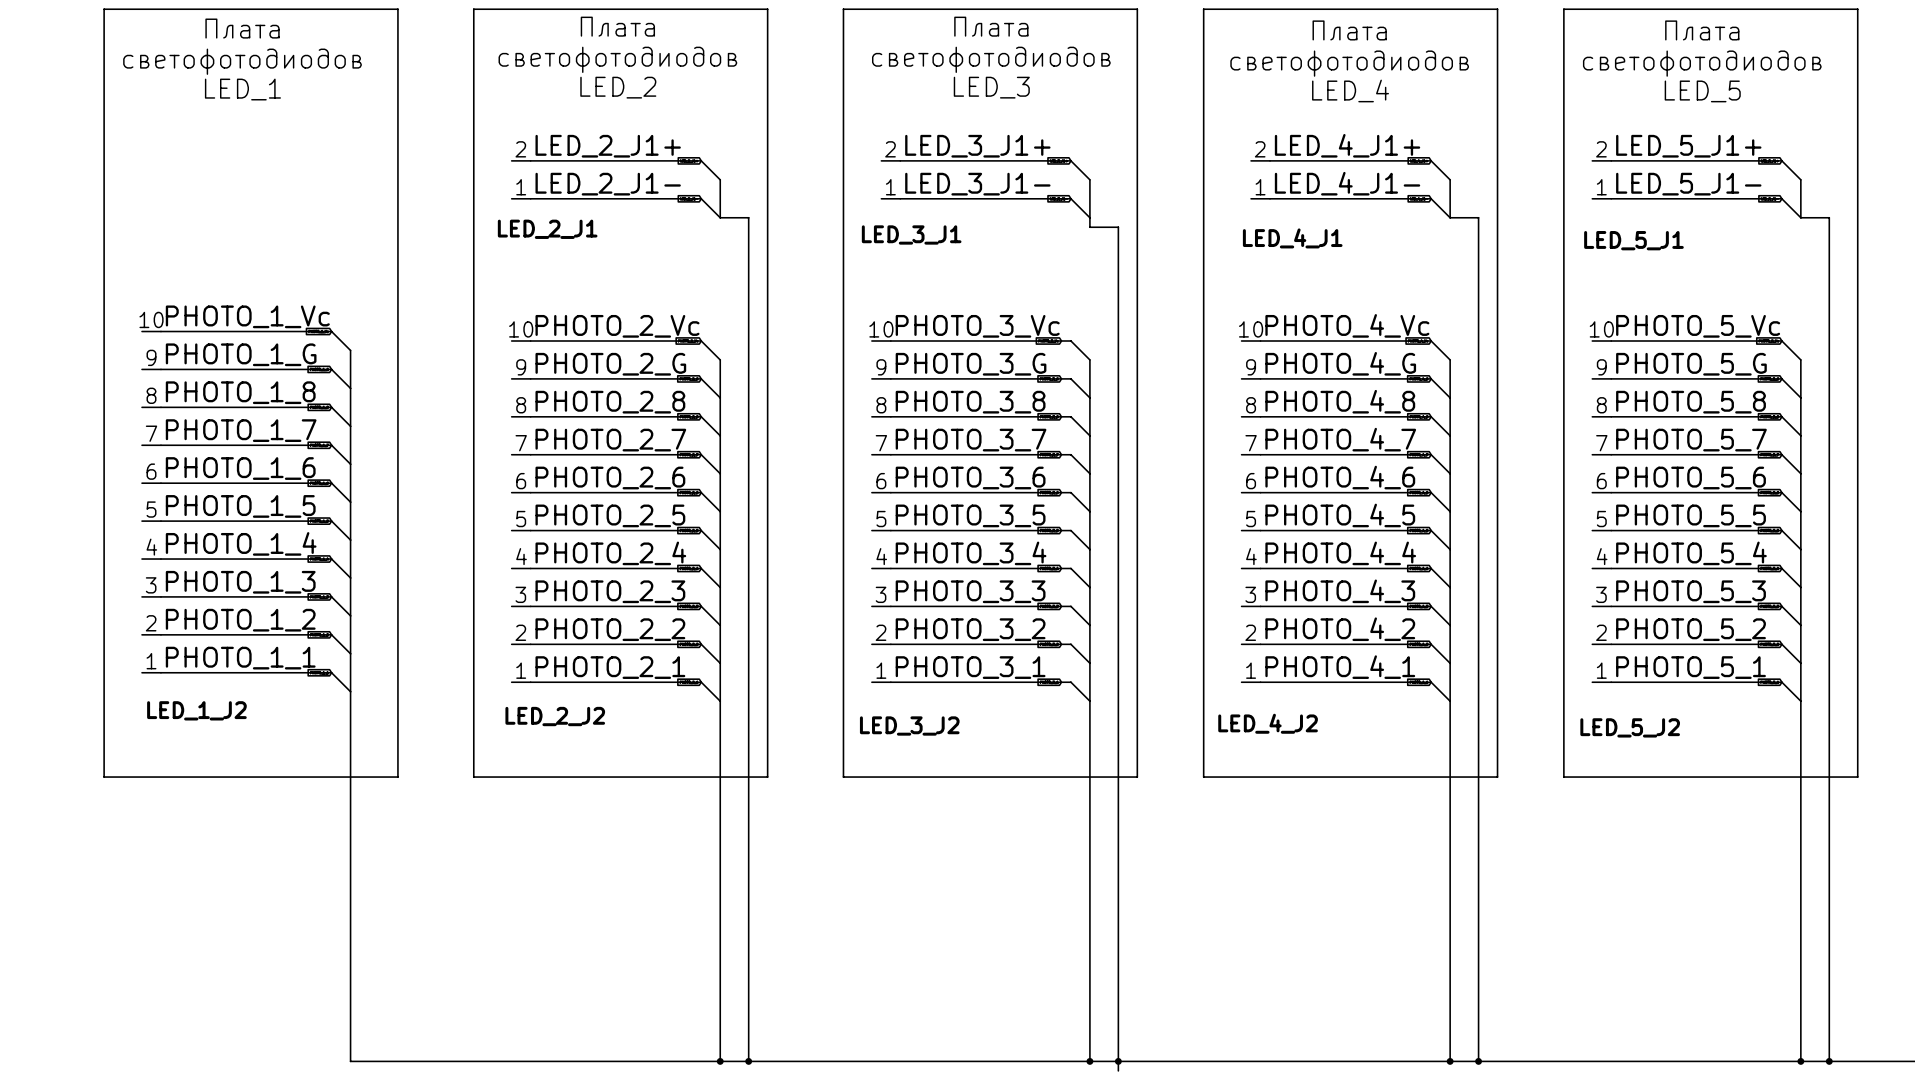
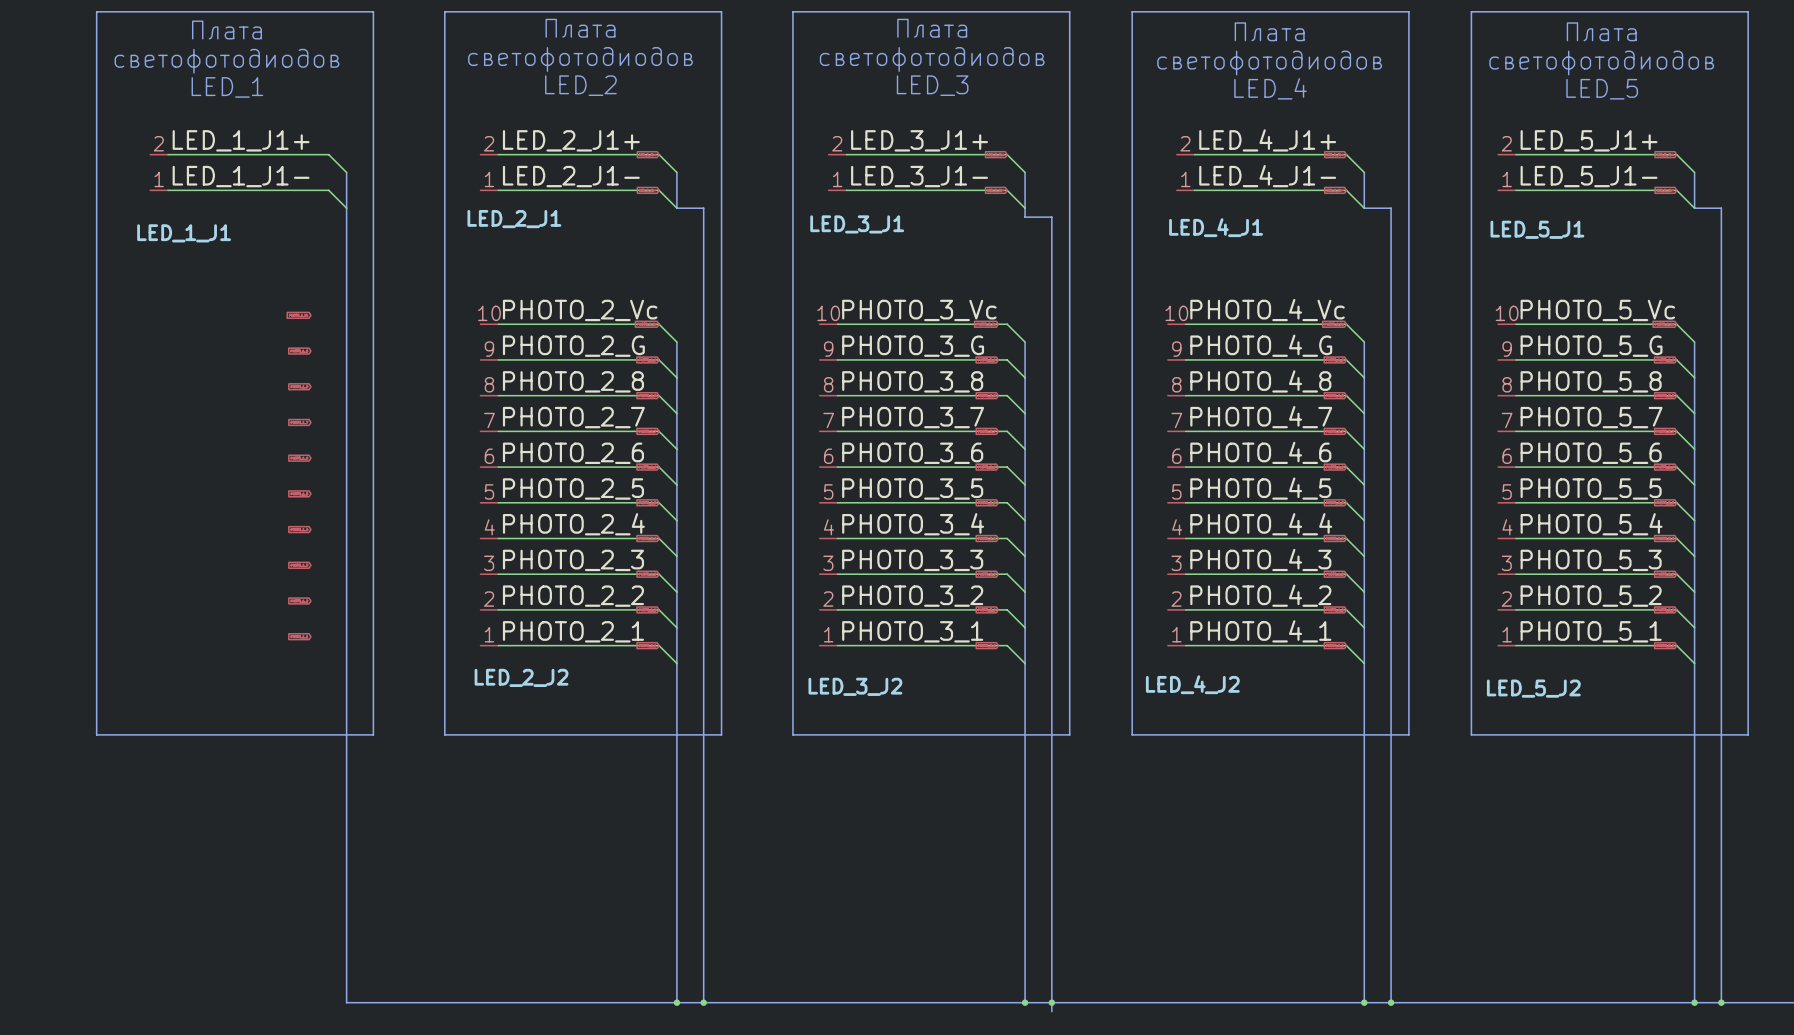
label: none -> LED_1_J1+ (241, 140)
LED_1_J1: none -> (159, 172)
label: none -> LED_1_J1- (241, 176)
label: PHOTO_1_Vc (247, 316) -> none
wire: (160, 331) (331, 331) (350, 350) -> (168, 154) (328, 154) (346, 172)
bus: (350, 350) (350, 1061) (369, 1061) -> (346, 172) (346, 1002)
label: PHOTO_1_G (241, 354) -> none
wire: (160, 369) (331, 369) (350, 388) -> (168, 190) (328, 190) (346, 208)
label: PHOTO_1_8 (240, 392) -> none
wire: (160, 407) (331, 407) (350, 426) -> none
label: PHOTO_1_7 (241, 430) -> none
wire: (160, 445) (331, 445) (350, 464) -> none
label: PHOTO_1_6 (240, 468) -> none
wire: (160, 483) (331, 483) (350, 502) -> none
LED_1_J2: (151, 502) -> none
label: PHOTO_1_5 (240, 506) -> none
wire: (160, 521) (331, 521) (350, 540) -> none
label: PHOTO_1_4 (241, 543) -> none
wire: (160, 559) (331, 559) (350, 577) -> none
label: PHOTO_1_3 (240, 582) -> none
wire: (160, 596) (331, 596) (350, 615) -> none
label: PHOTO_1_2 (240, 620) -> none
wire: (160, 634) (331, 634) (350, 653) -> none
label: PHOTO_1_1 (240, 658) -> none
wire: (160, 672) (331, 672) (350, 691) -> none

